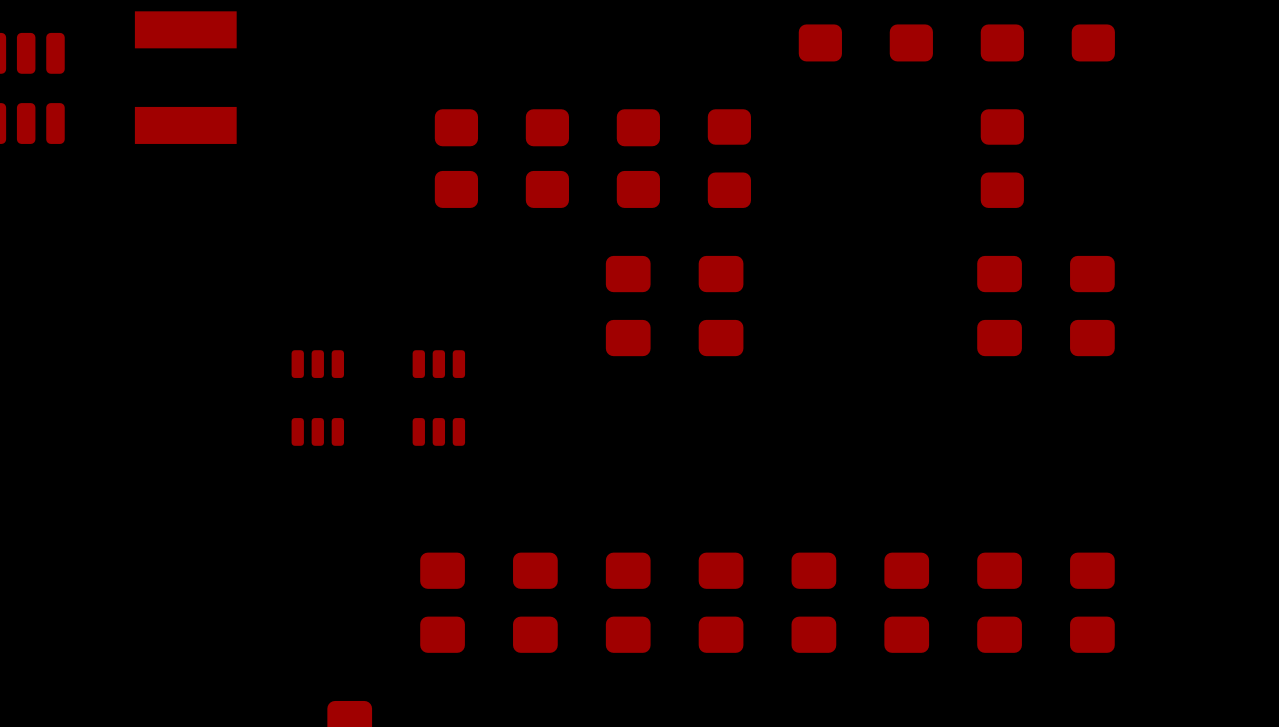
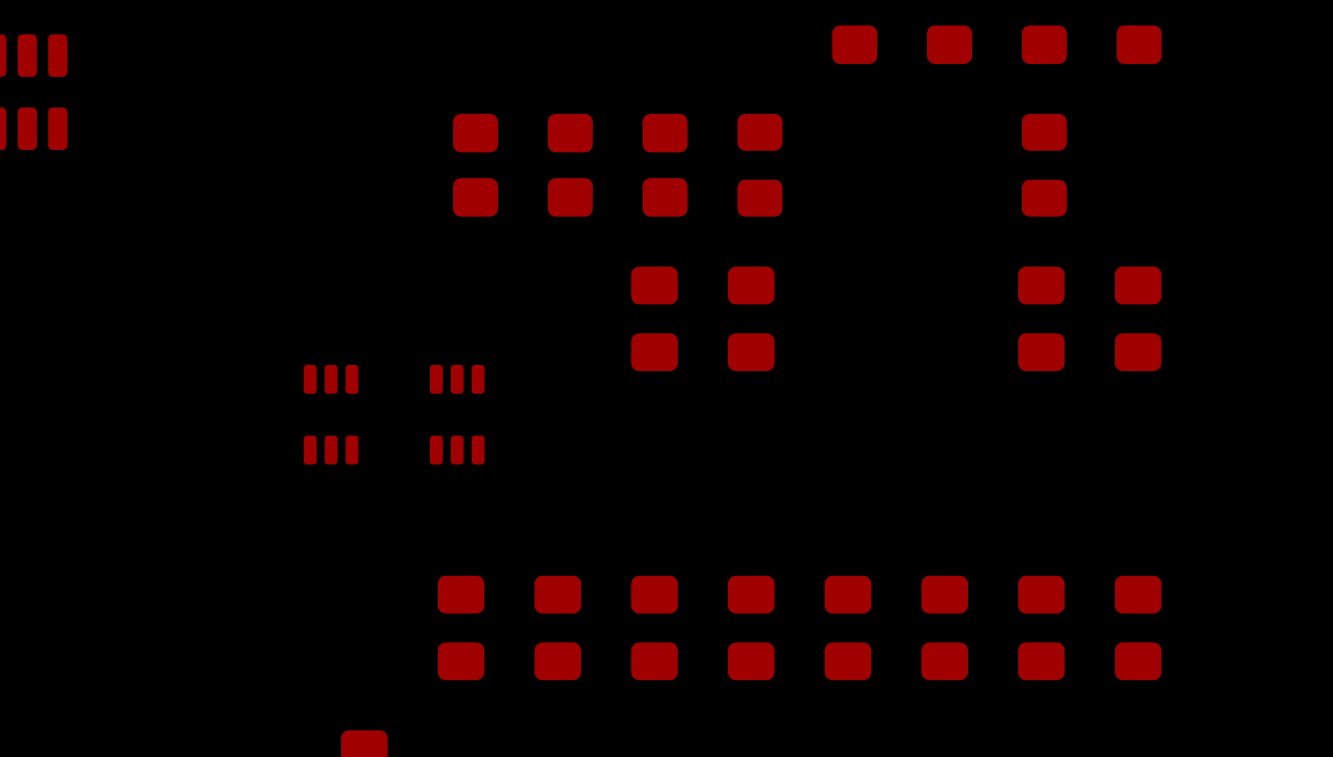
part: (185, 77) -> none

